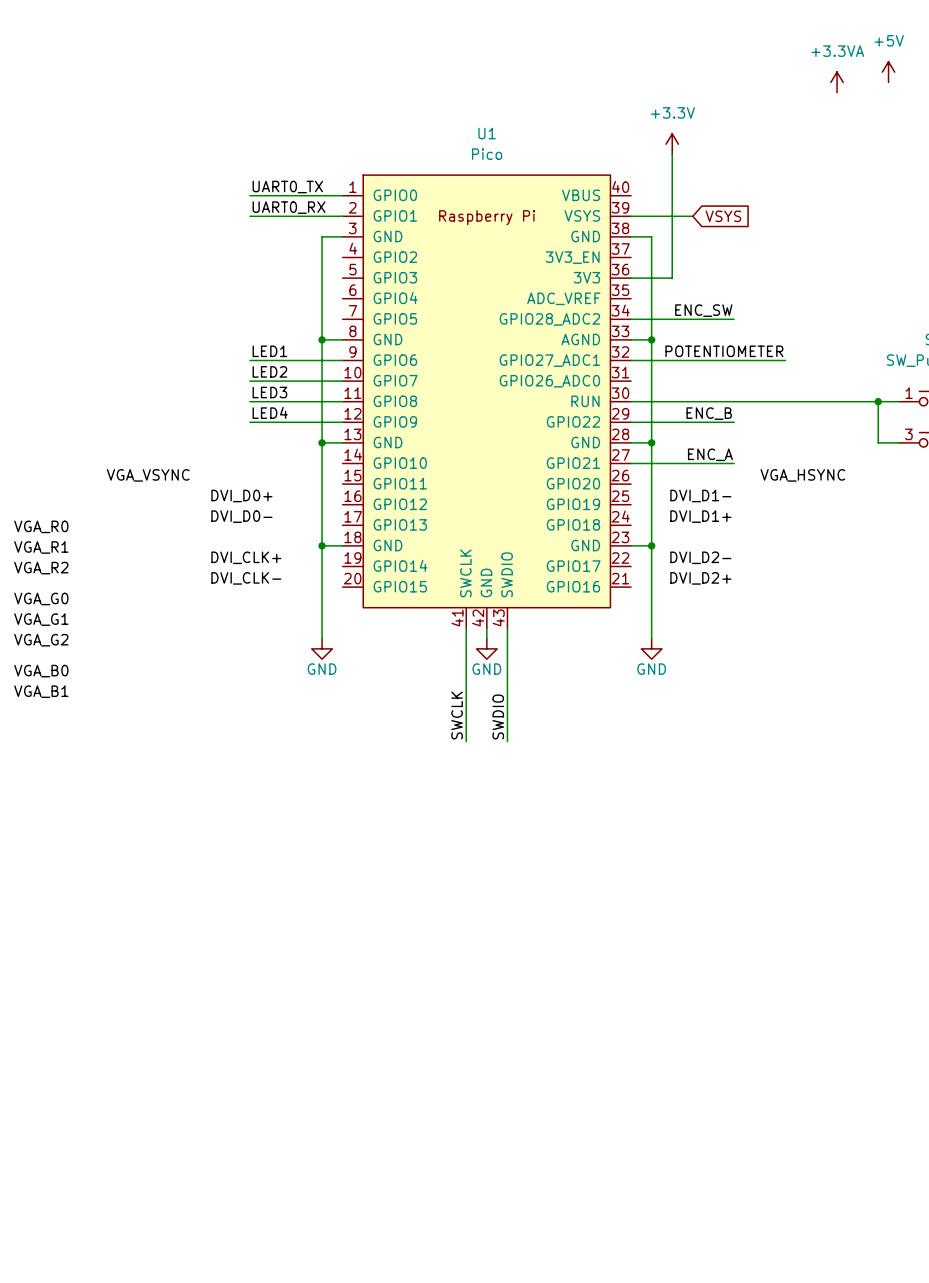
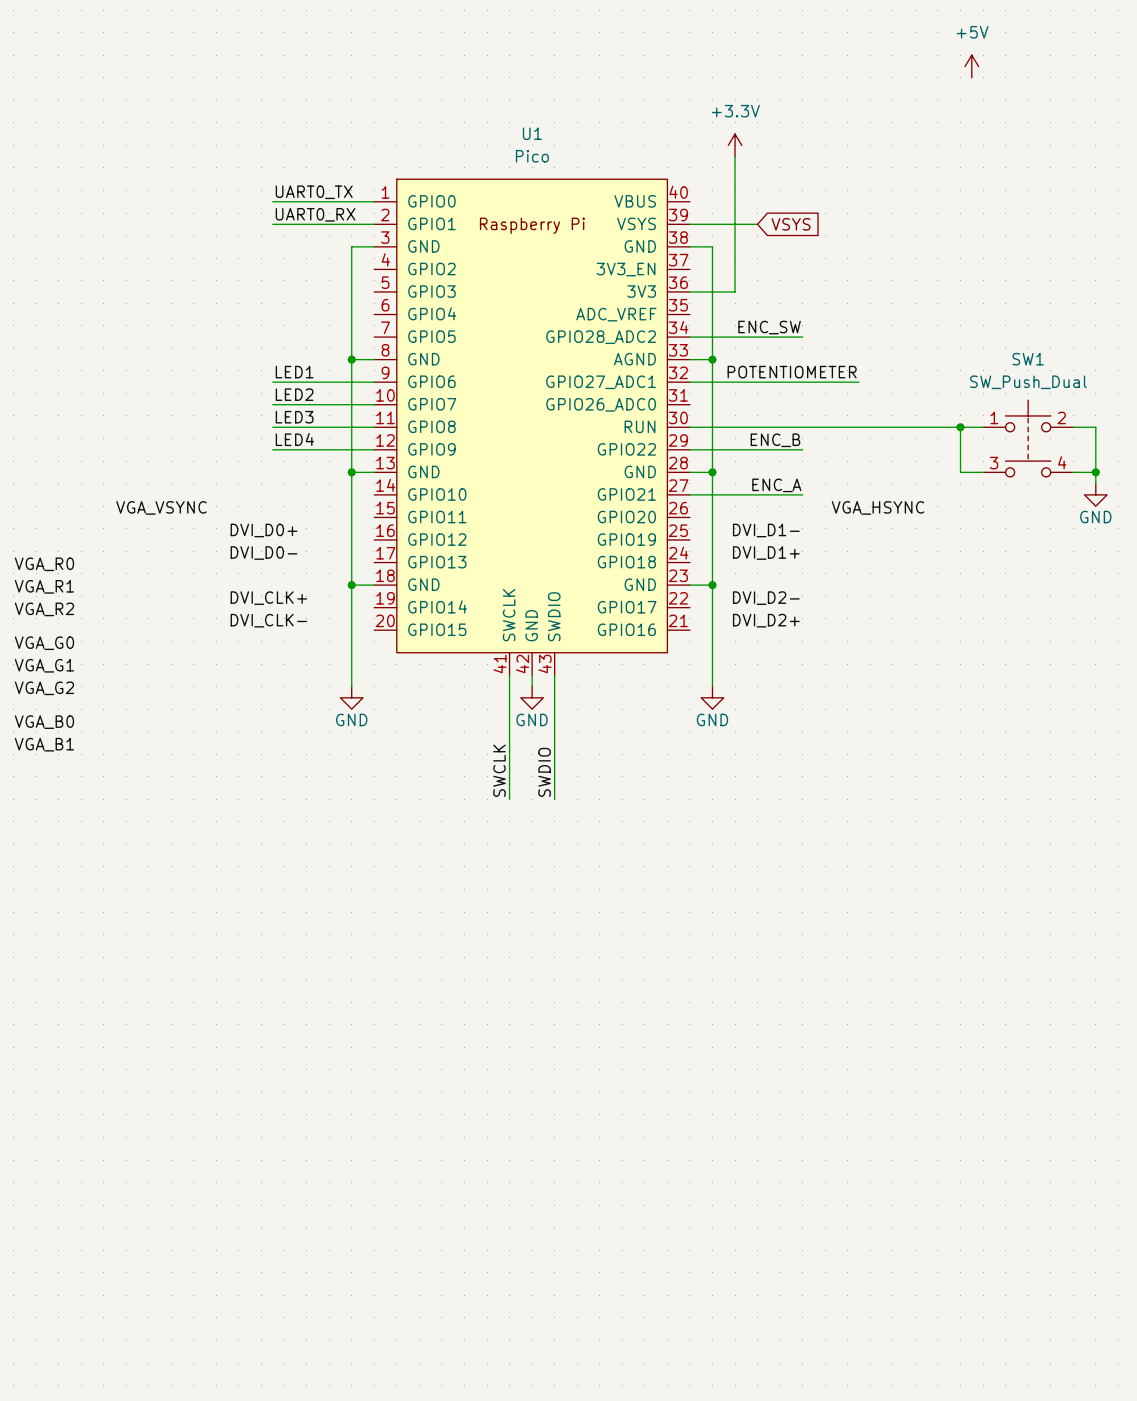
power symbol: +3.3VA (837, 82) -> none

